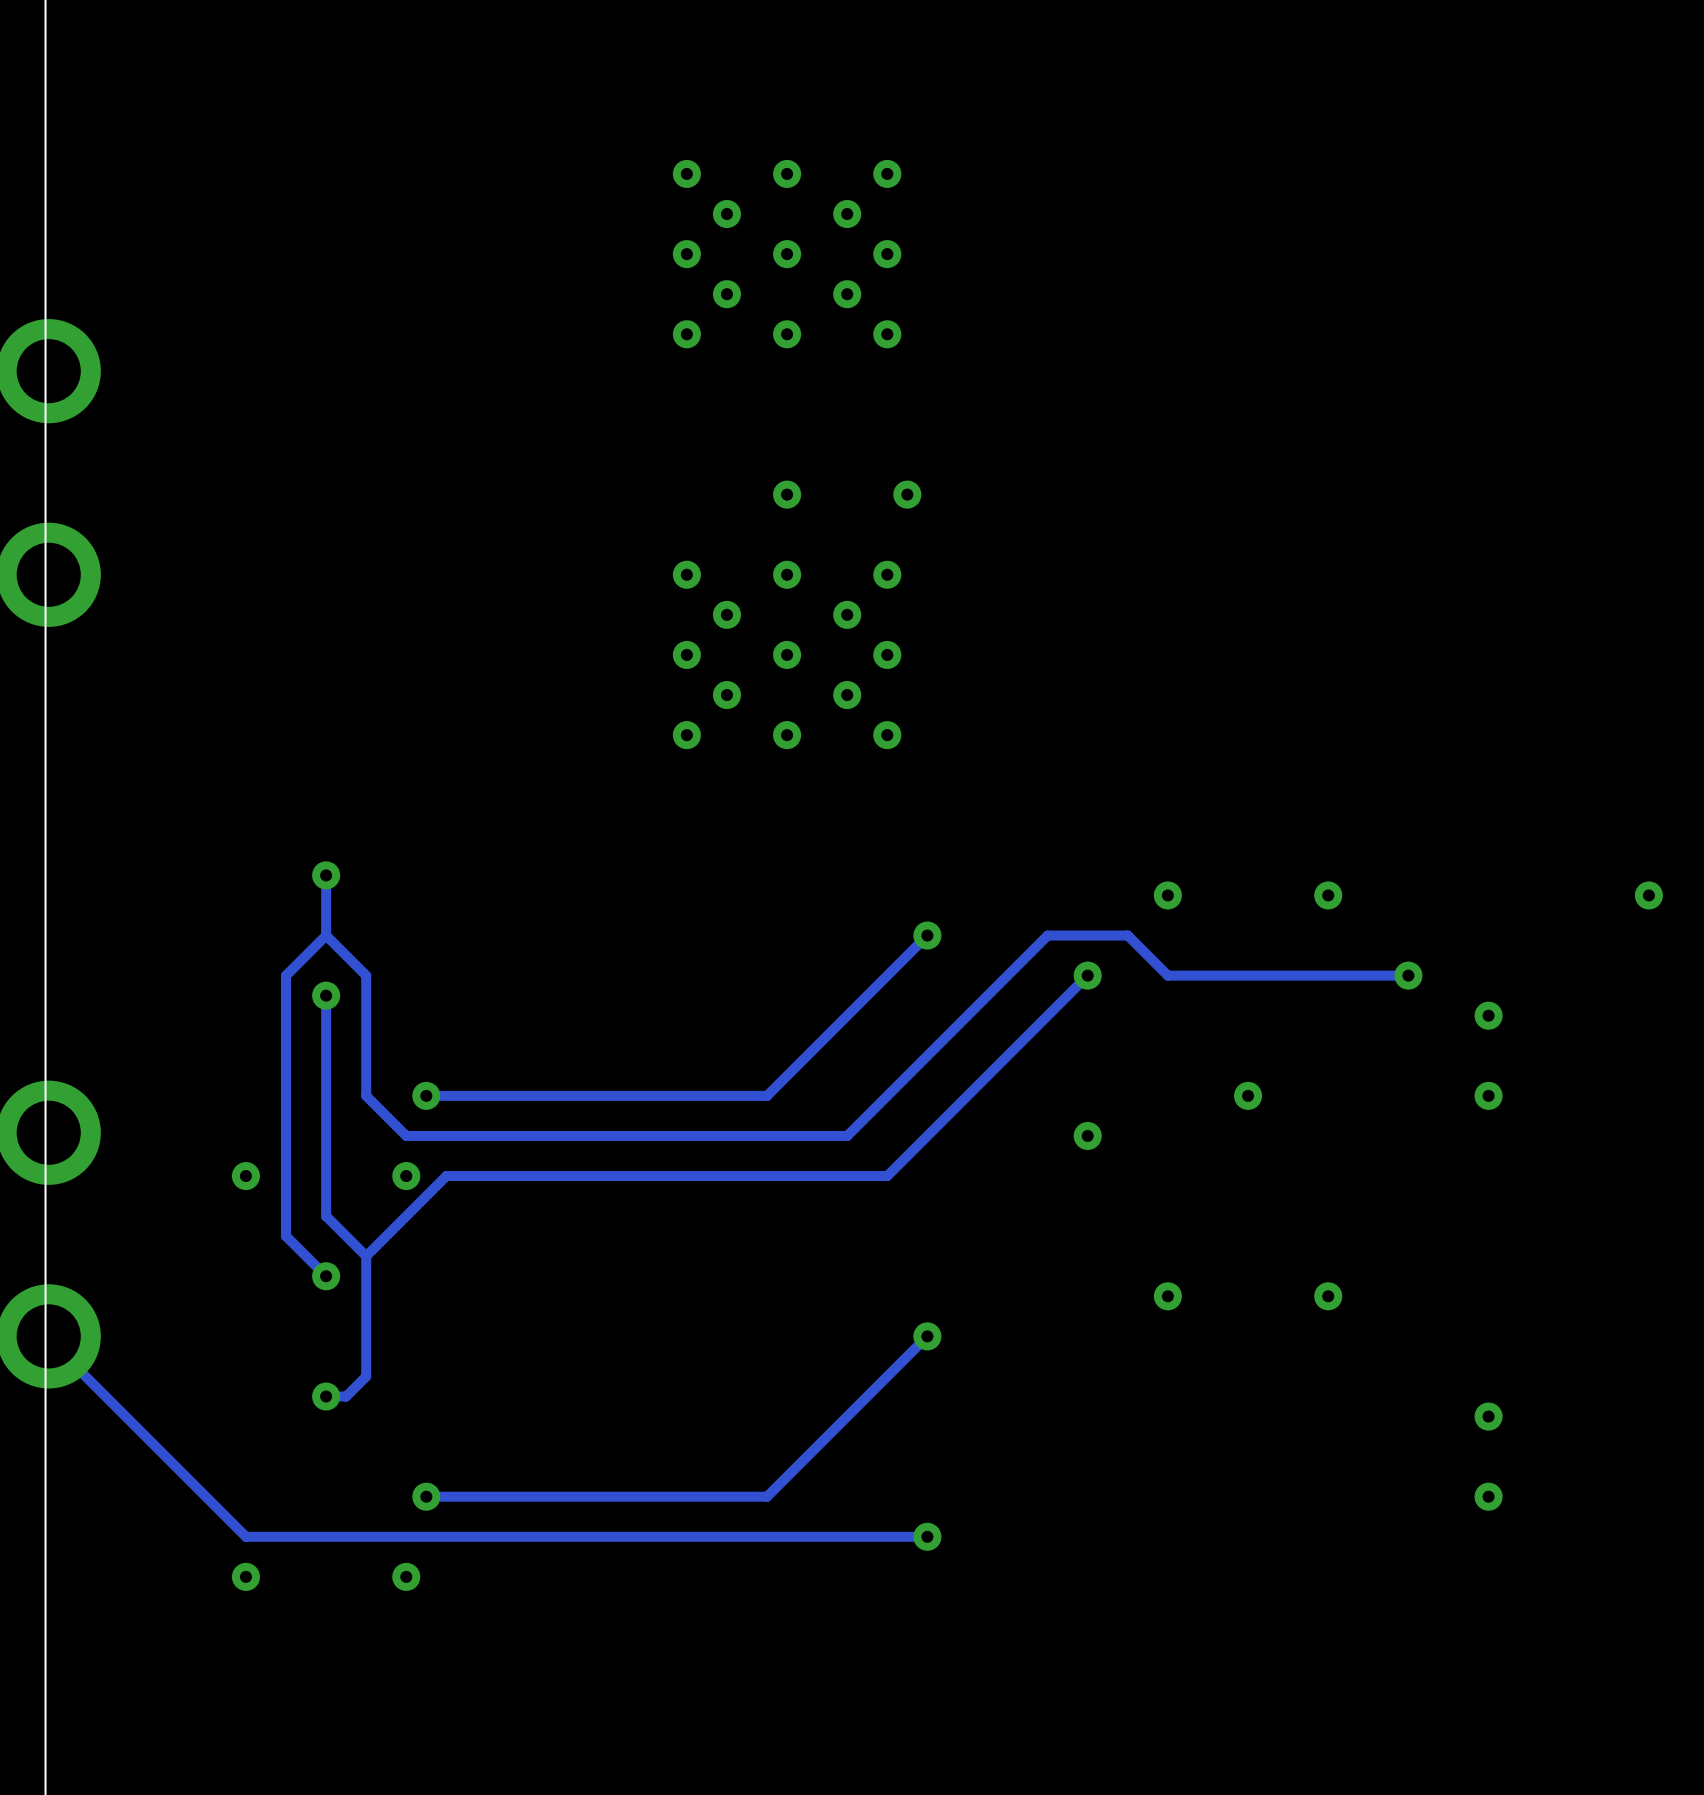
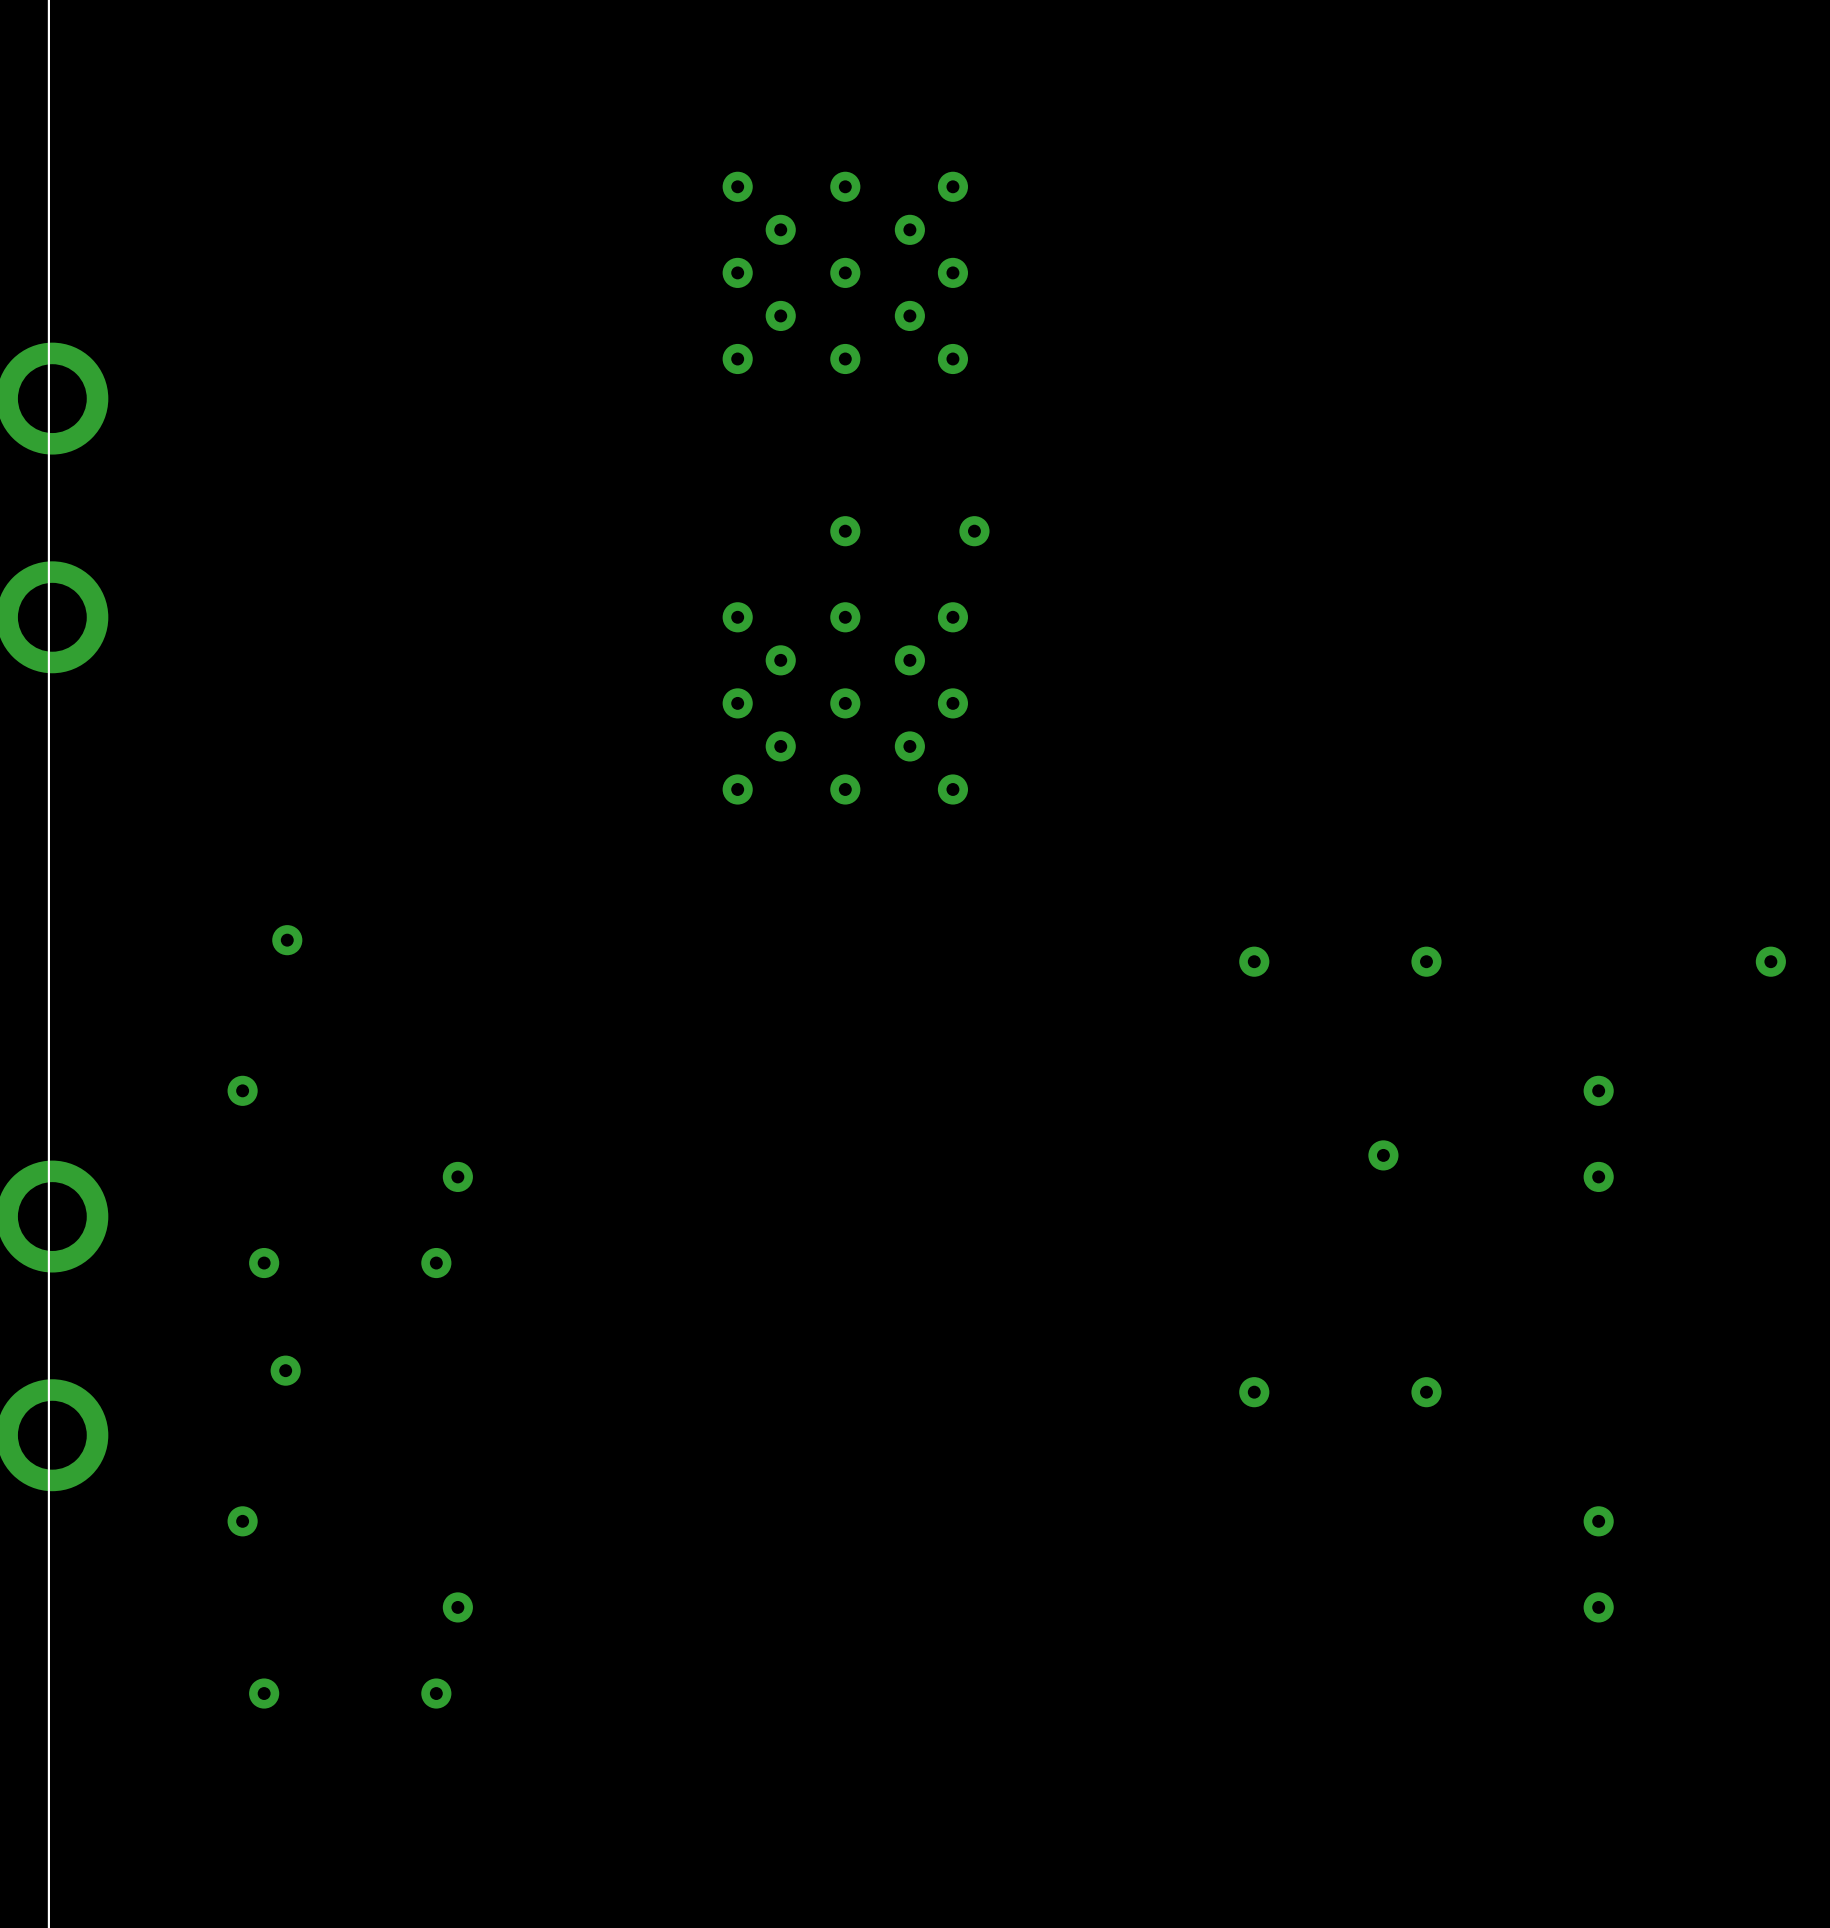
track: (326, 875) (326, 935) -> none
via position: (326, 875) -> (287, 940)
track: (326, 935) (366, 975) (366, 1095) (406, 1135) (847, 1135) (1047, 935) (1127, 935) (1167, 975) (1408, 975) -> none
track: (326, 935) (286, 975) (286, 1236) (326, 1276) -> none
track: (927, 935) (767, 1095) (426, 1095) -> none
via: (927, 935) -> none
track: (1087, 975) (887, 1176) (446, 1176) (366, 1256) -> none
via: (1087, 975) -> none
via: (1408, 975) -> none
track: (326, 995) (326, 1216) (366, 1256) -> none
via: (326, 995) -> none
via: none -> (242, 1090)
via position: (1248, 1095) -> (1383, 1155)
via: (1087, 1135) -> none
track: (366, 1256) (366, 1376) (346, 1396) (326, 1396) -> none
via position: (326, 1276) -> (285, 1370)
track: (51, 1336) (51, 1342) (245, 1536) (927, 1536) -> none
track: (927, 1336) (767, 1496) (426, 1496) -> none
via: (927, 1336) -> none
via: (326, 1396) -> none
via: none -> (242, 1521)
via: (927, 1536) -> none

